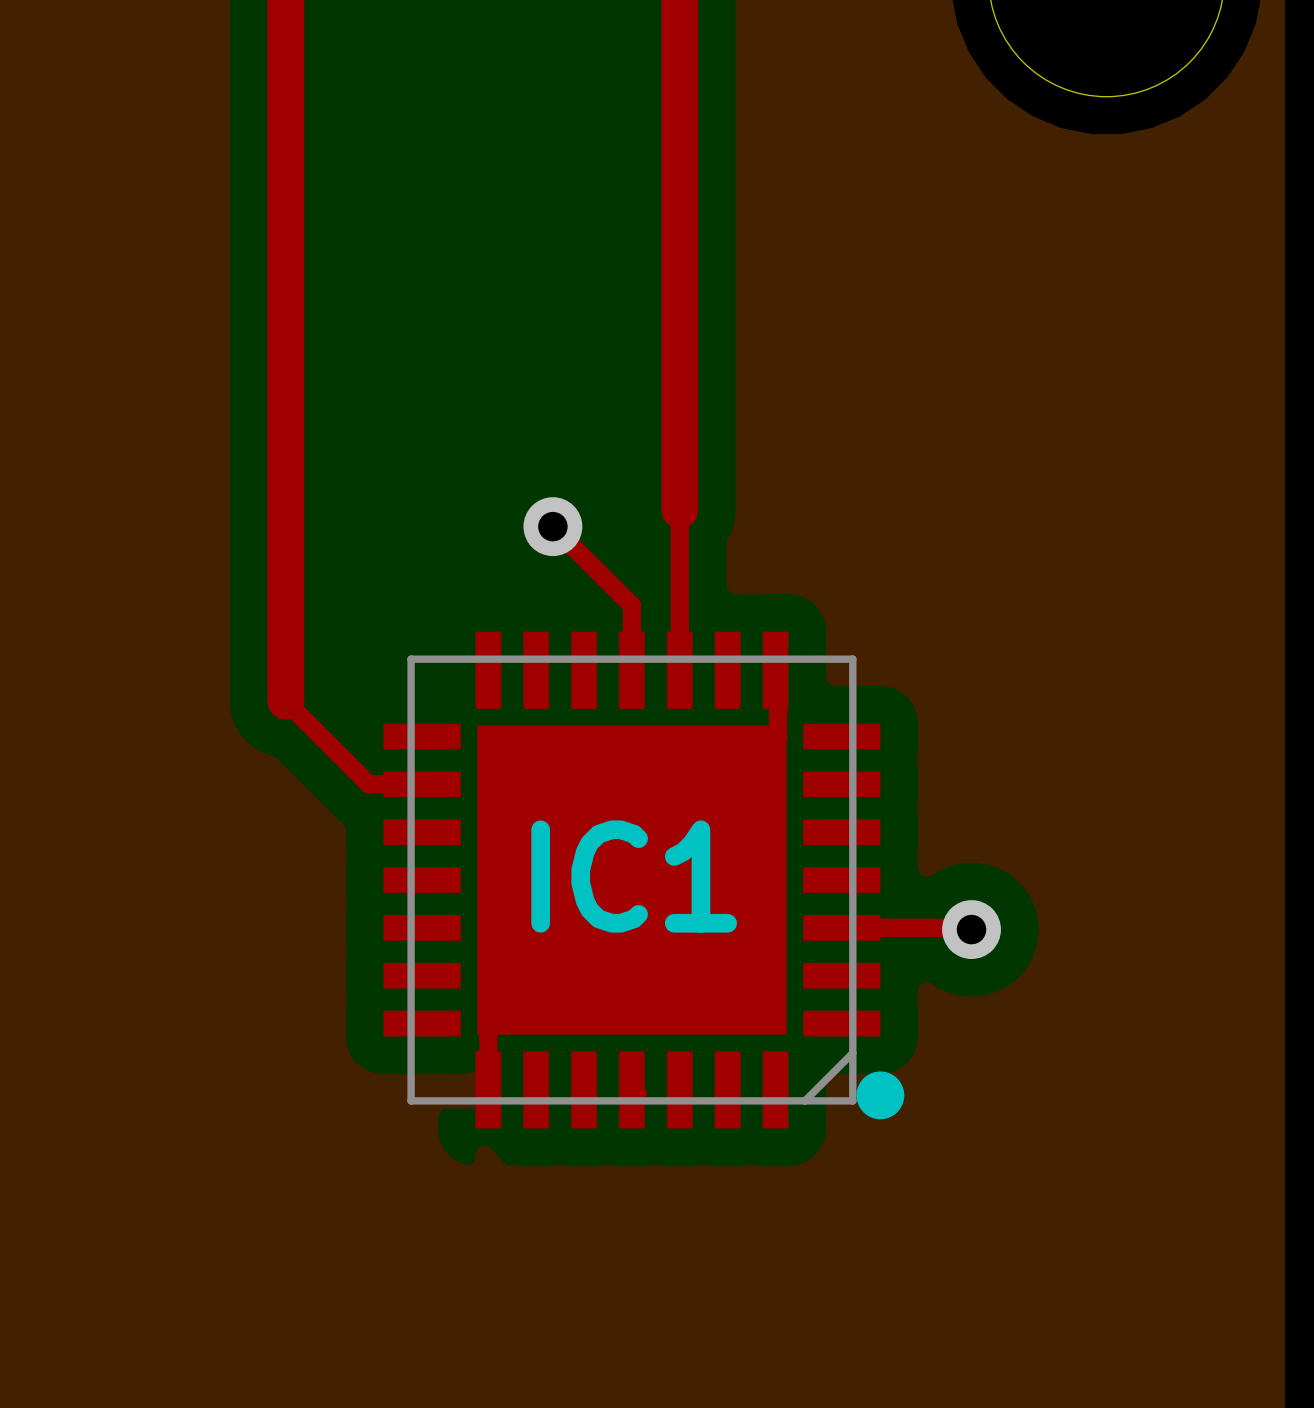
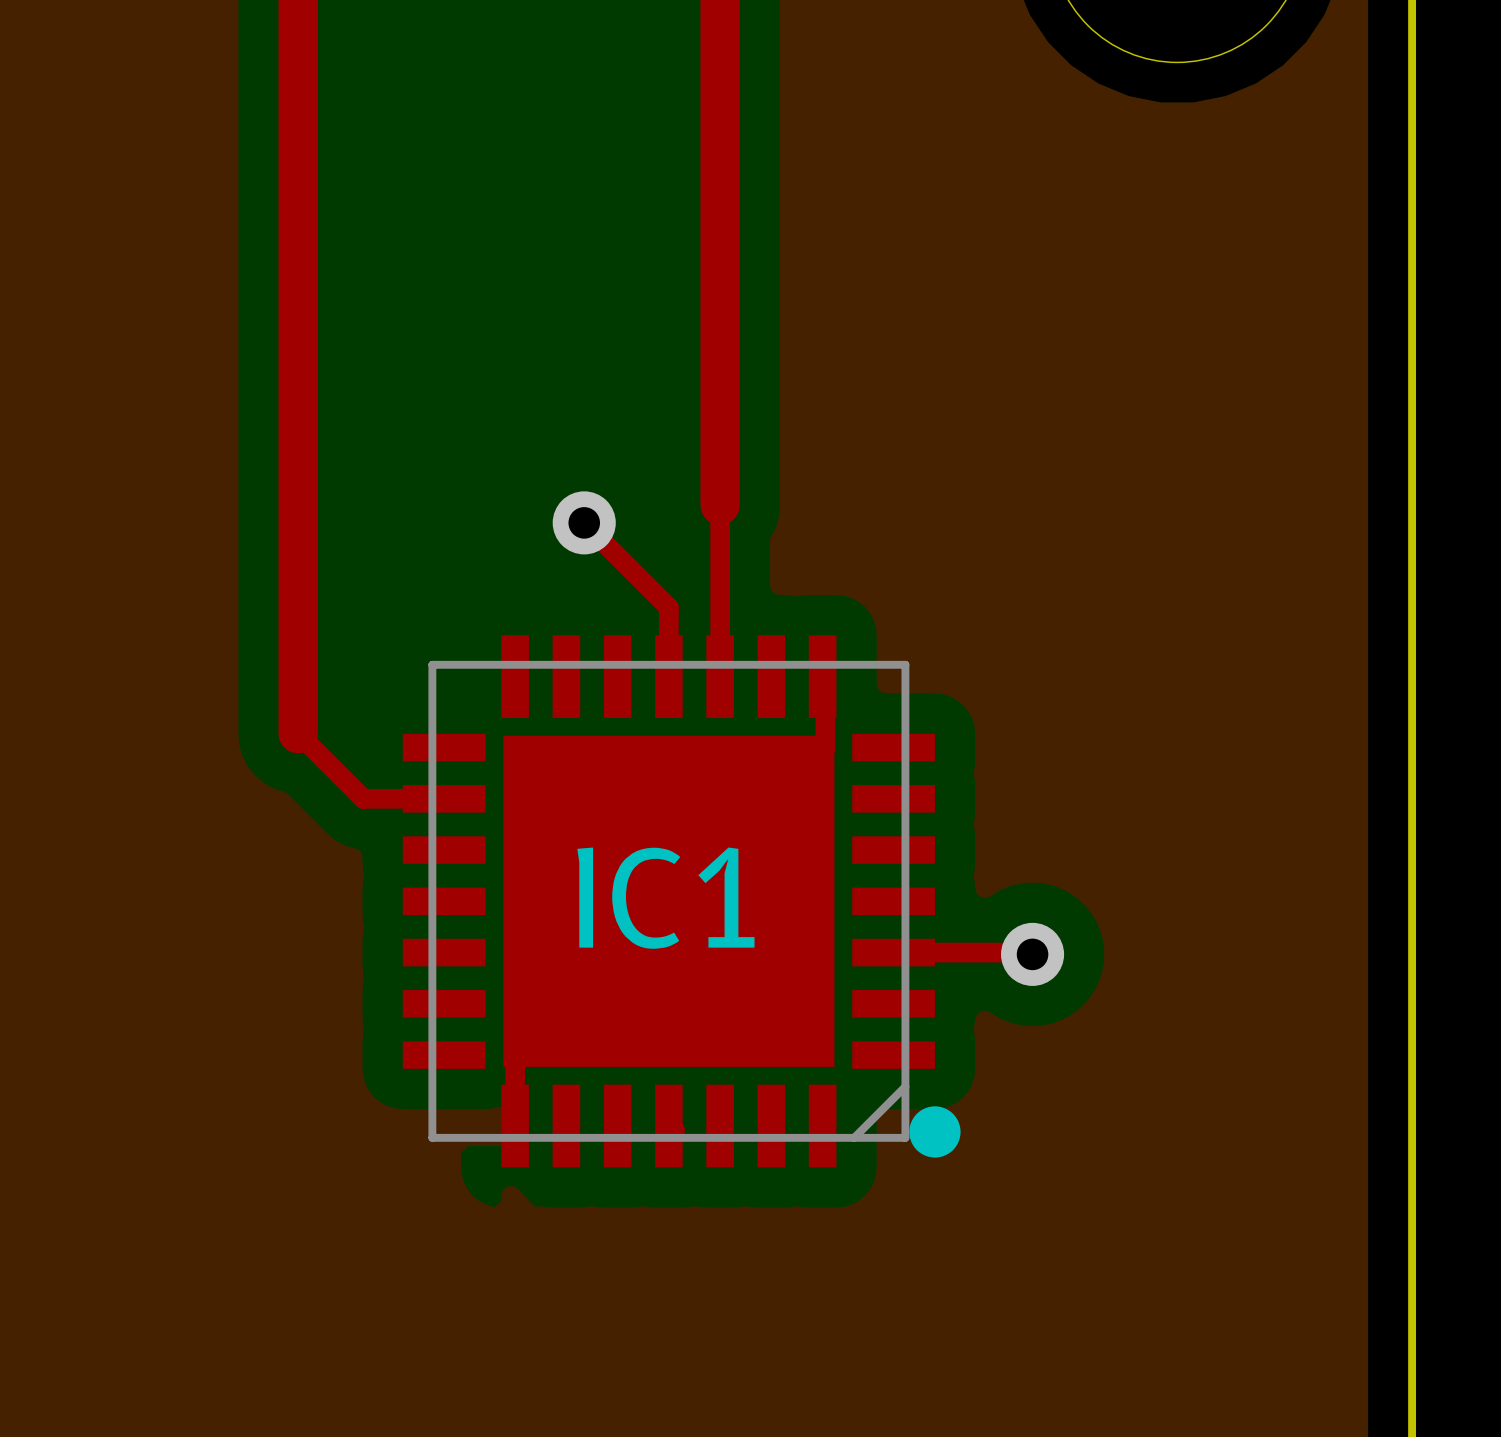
top track: (285, 701) (368, 784) -> (298, 709) (298, 733) (363, 798) (387, 798)

